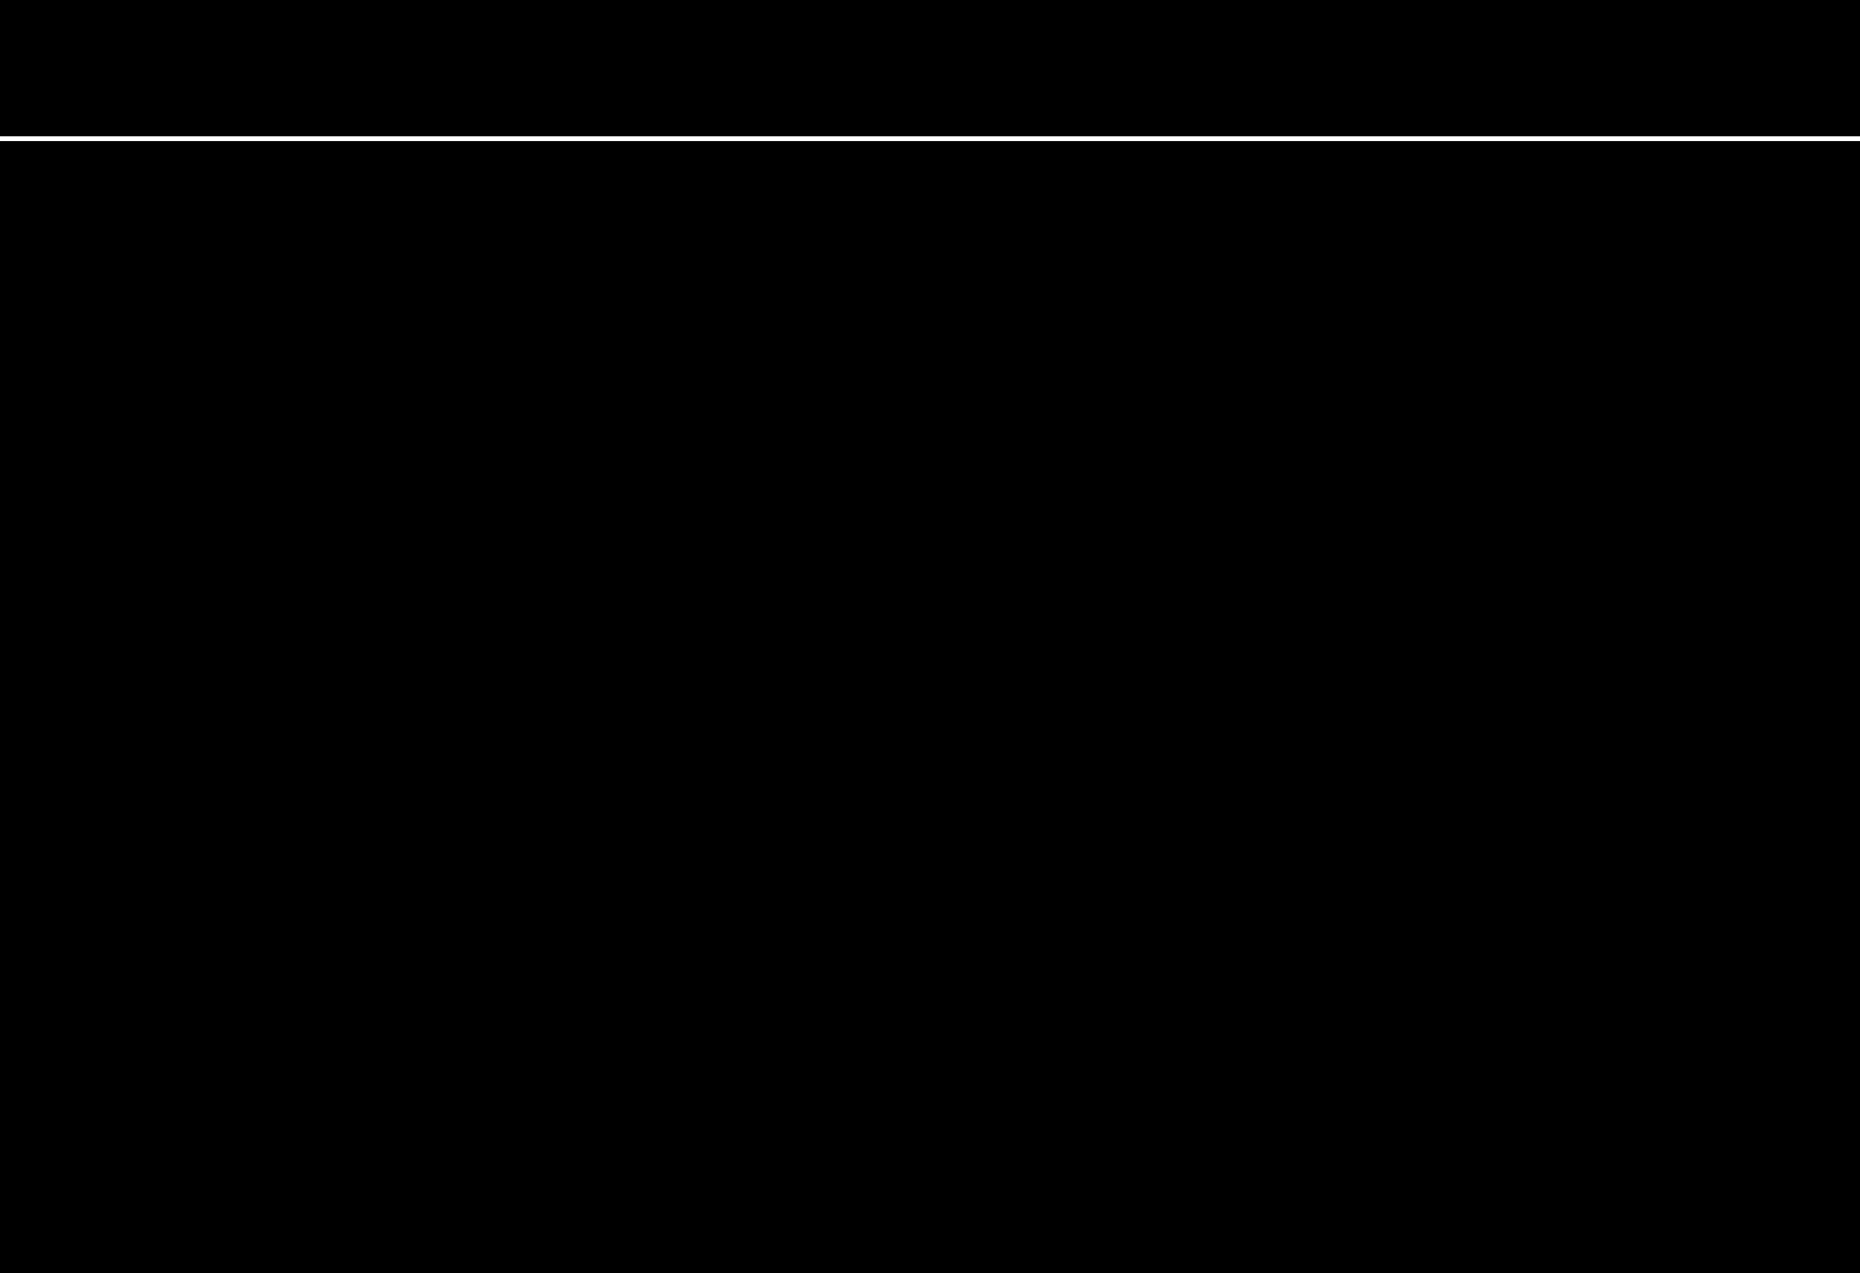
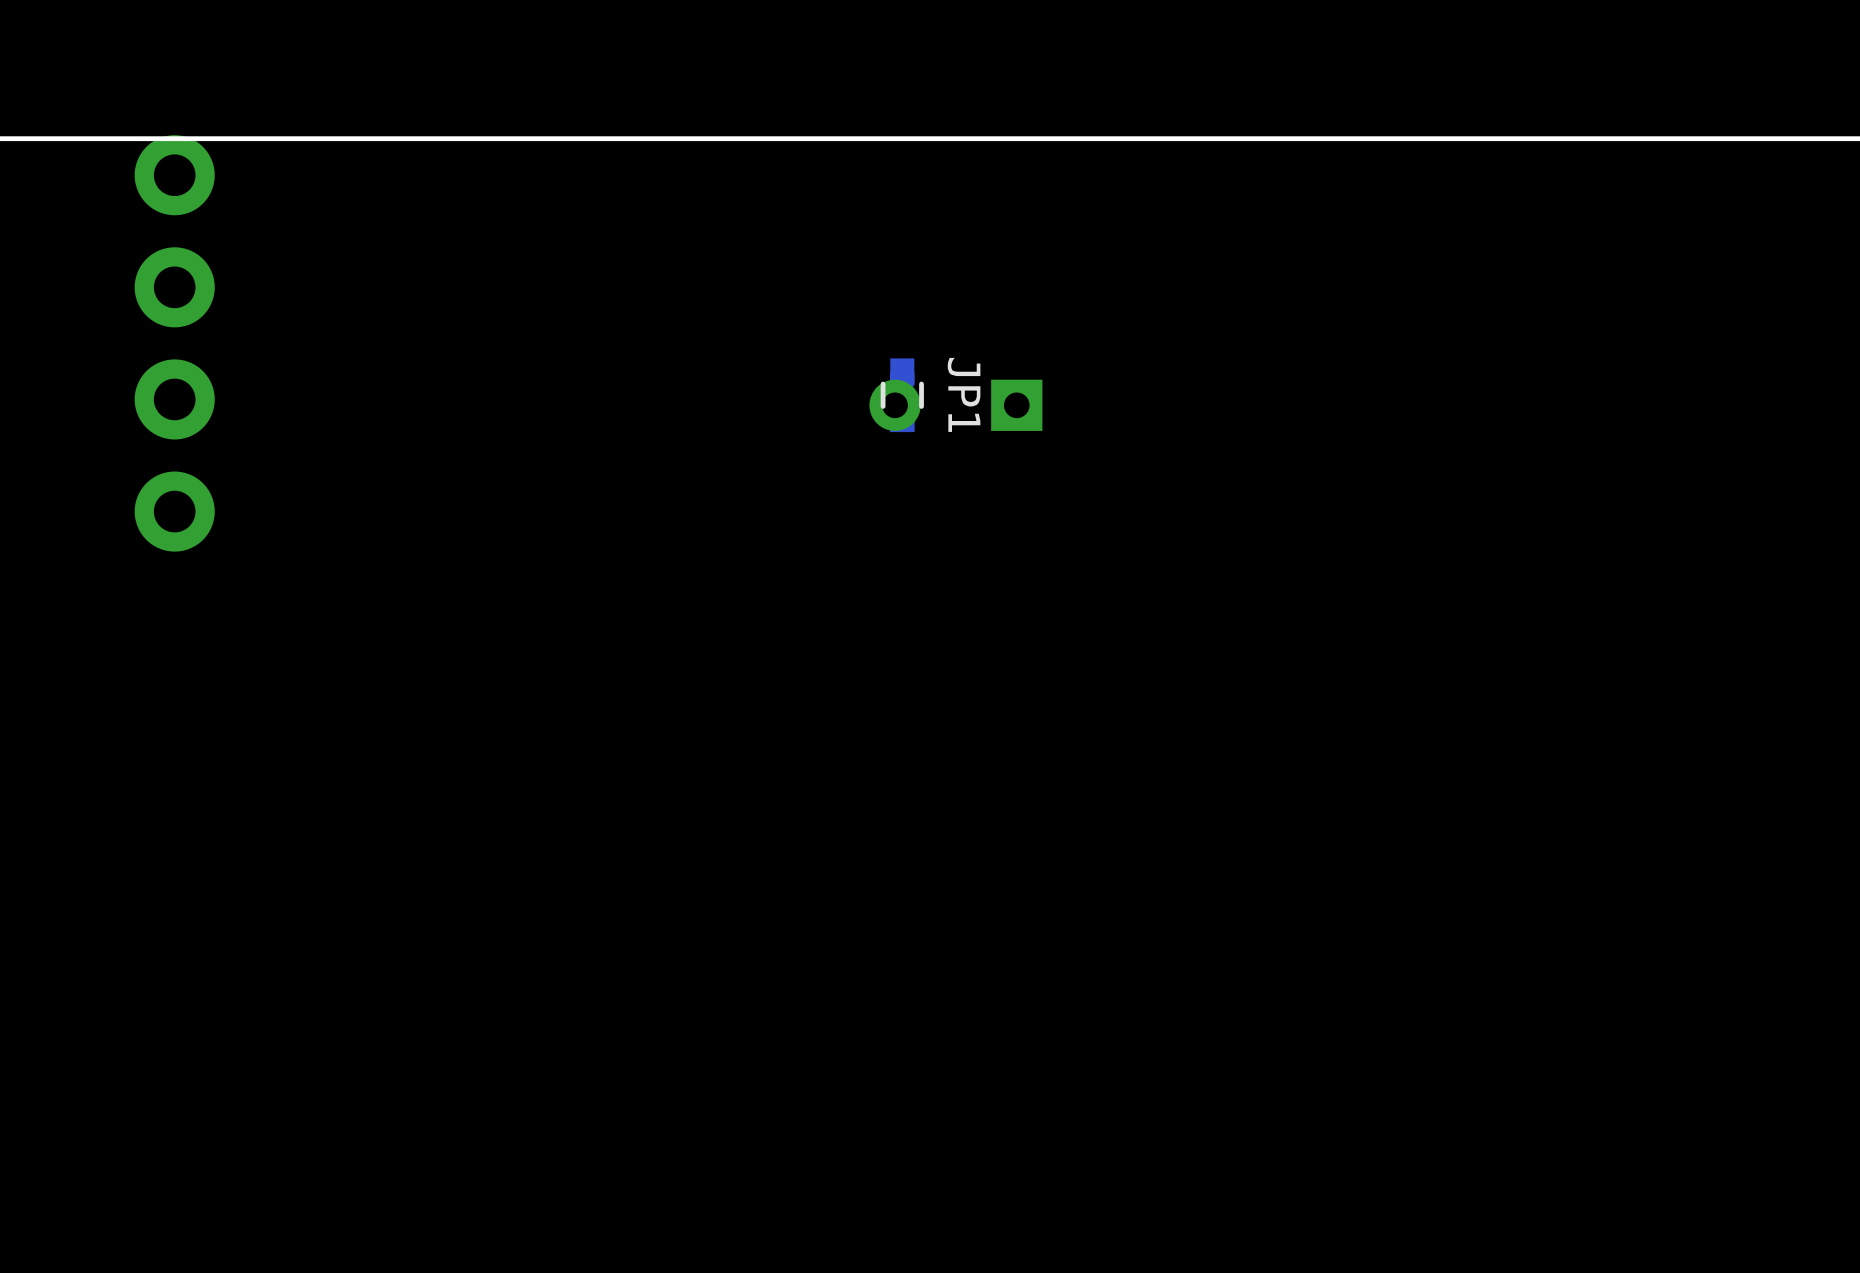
part: none -> (174, 343)
JP1: none -> (902, 395)
part: none -> (955, 405)

